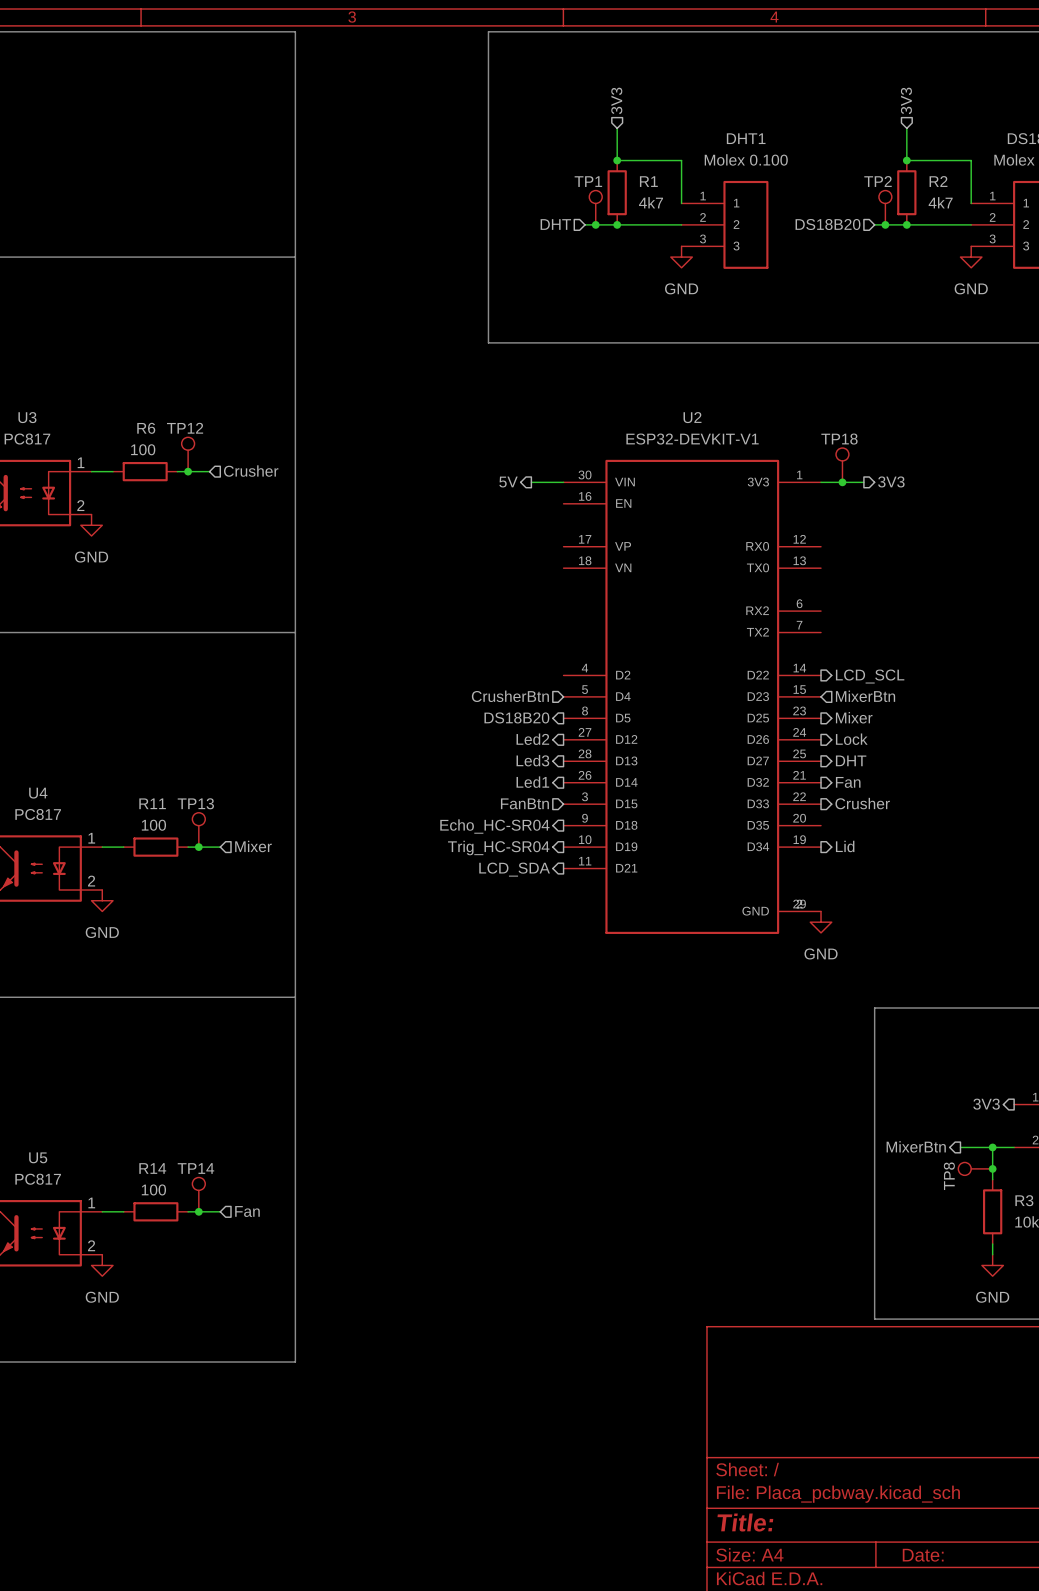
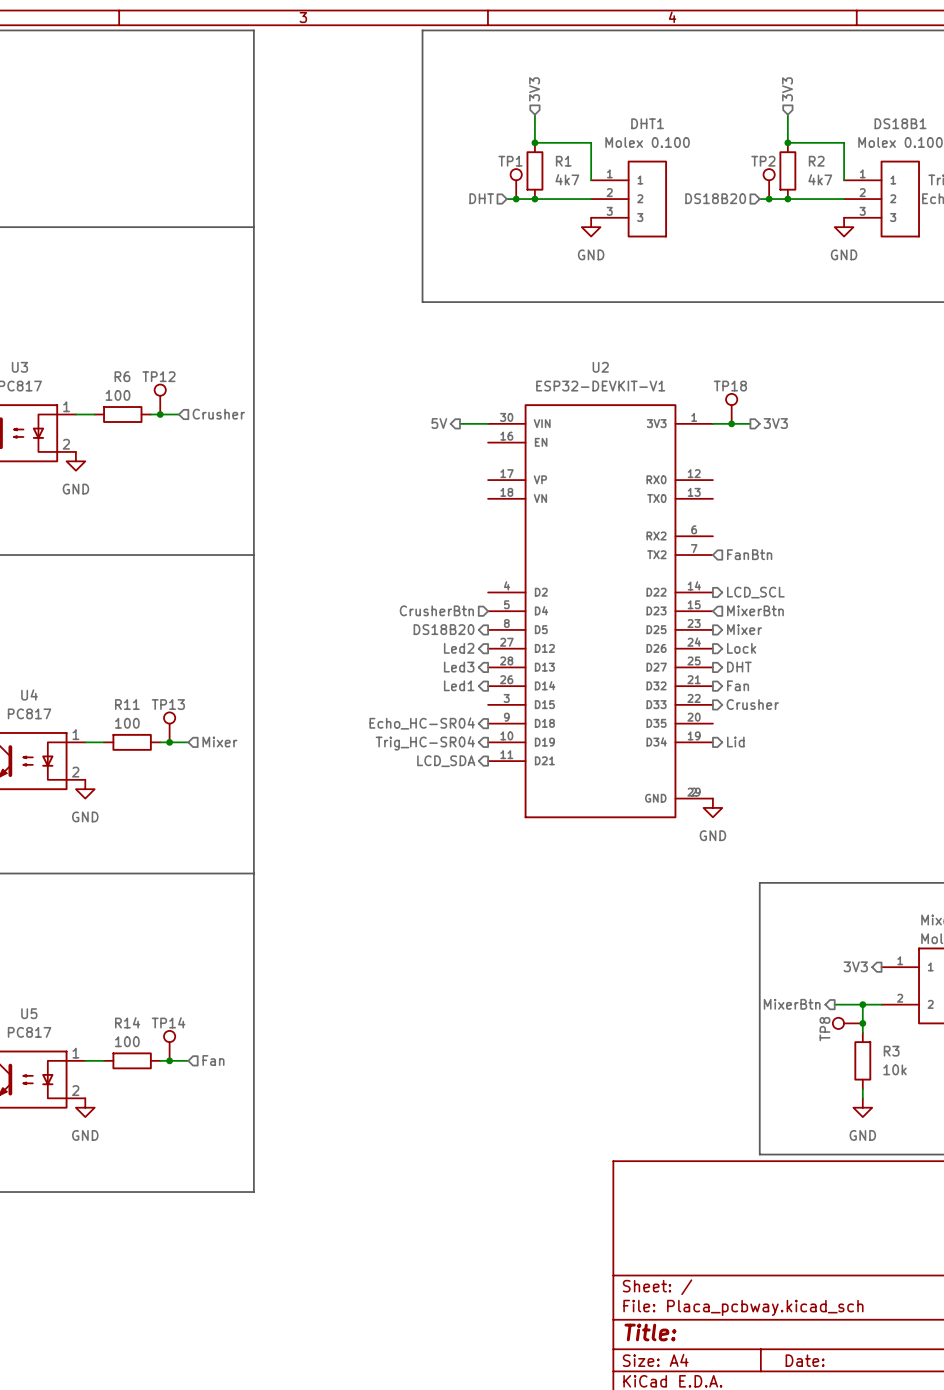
hierarchical label: none -> FanBtn (749, 554)
hierarchical label: FanBtn (524, 803) -> none

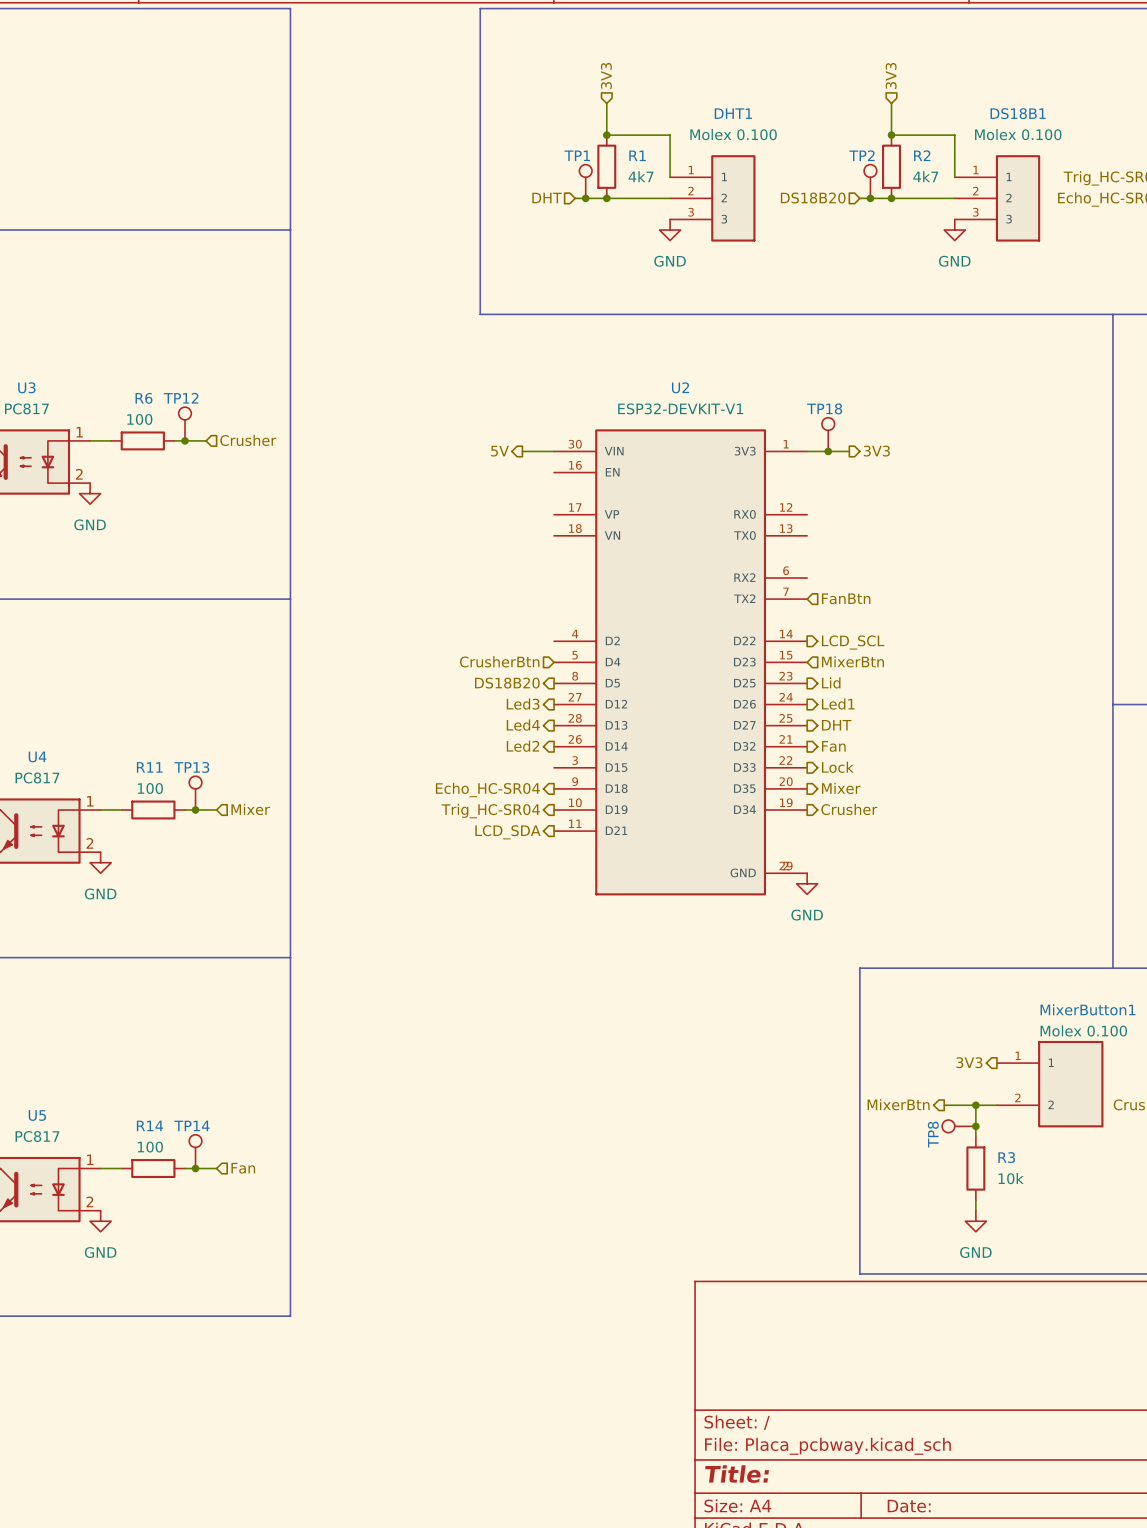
hierarchical label: Mixer (744, 629) -> Lid (831, 682)
hierarchical label: Led2 (459, 648) -> Led3 (523, 704)
hierarchical label: Lock (741, 648) -> Led1 (838, 704)
hierarchical label: Led3 (459, 667) -> Led4 (523, 725)
hierarchical label: Led1 (459, 685) -> Led2 (522, 746)
hierarchical label: Crusher (752, 704) -> Lock (837, 767)
hierarchical label: none -> Mixer (841, 788)
hierarchical label: Lid (735, 742) -> Crusher (849, 809)

